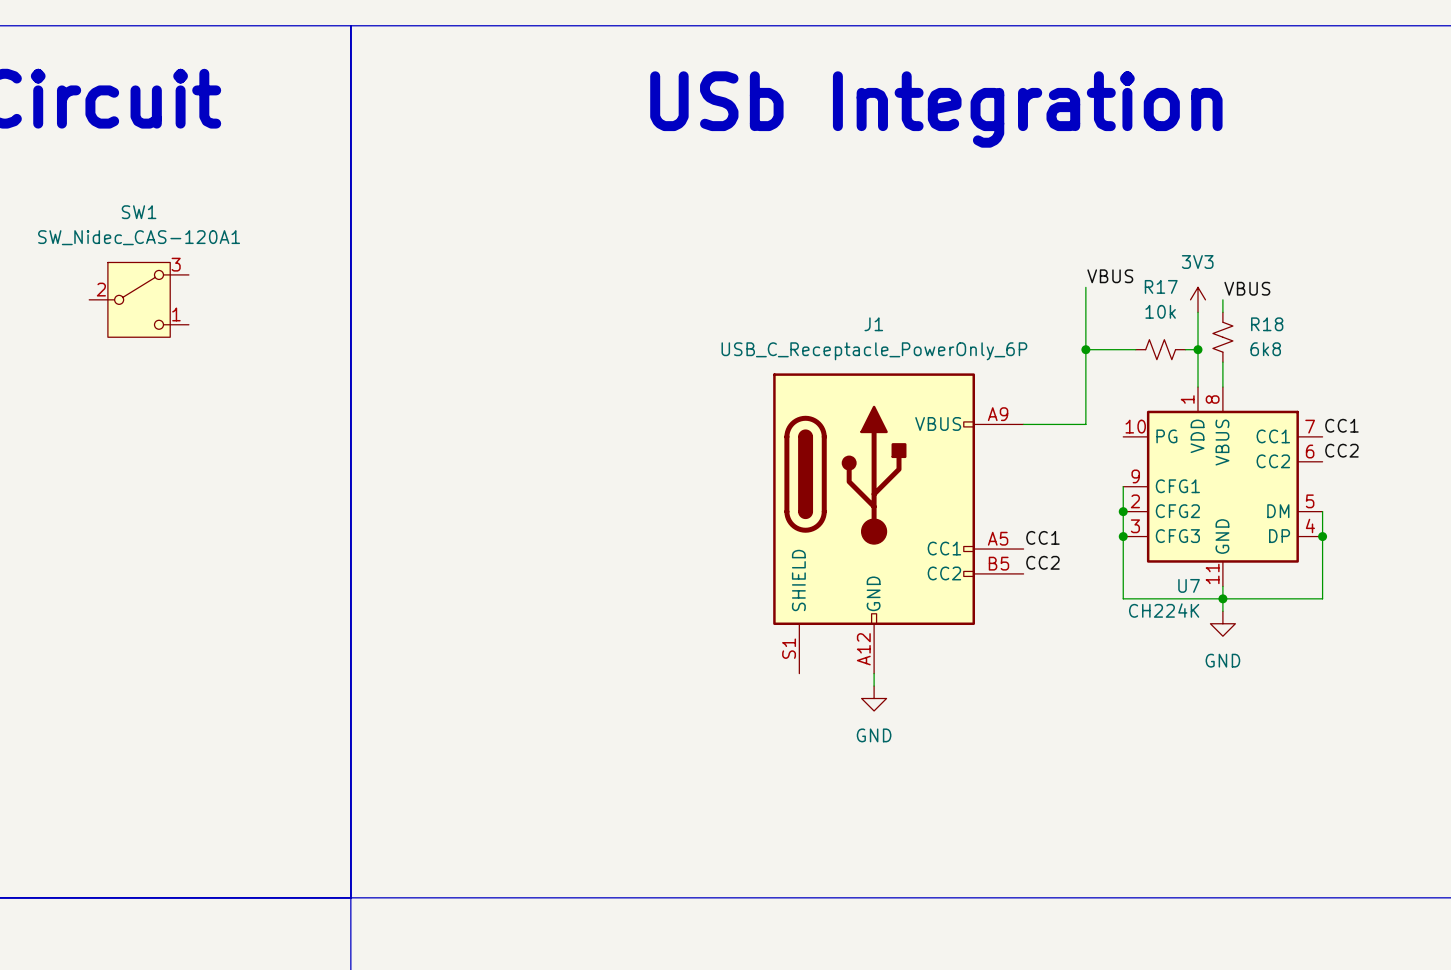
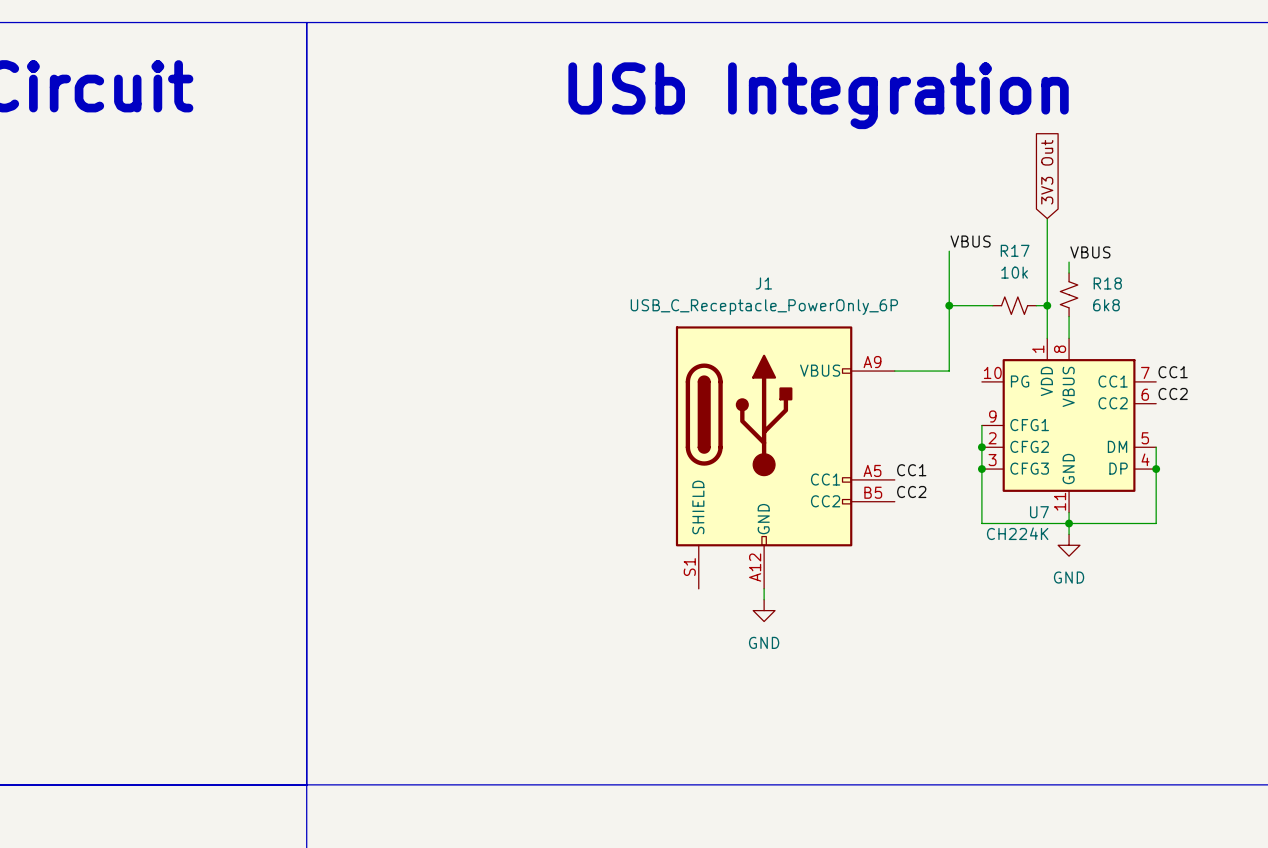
global label: none -> 3V3 Out (1047, 172)
wire: none -> (1047, 218) (1047, 273)
SW1: SW_Nidec_CAS-120A1 (139, 299) -> none
power symbol: 3V3 (1198, 299) -> none

